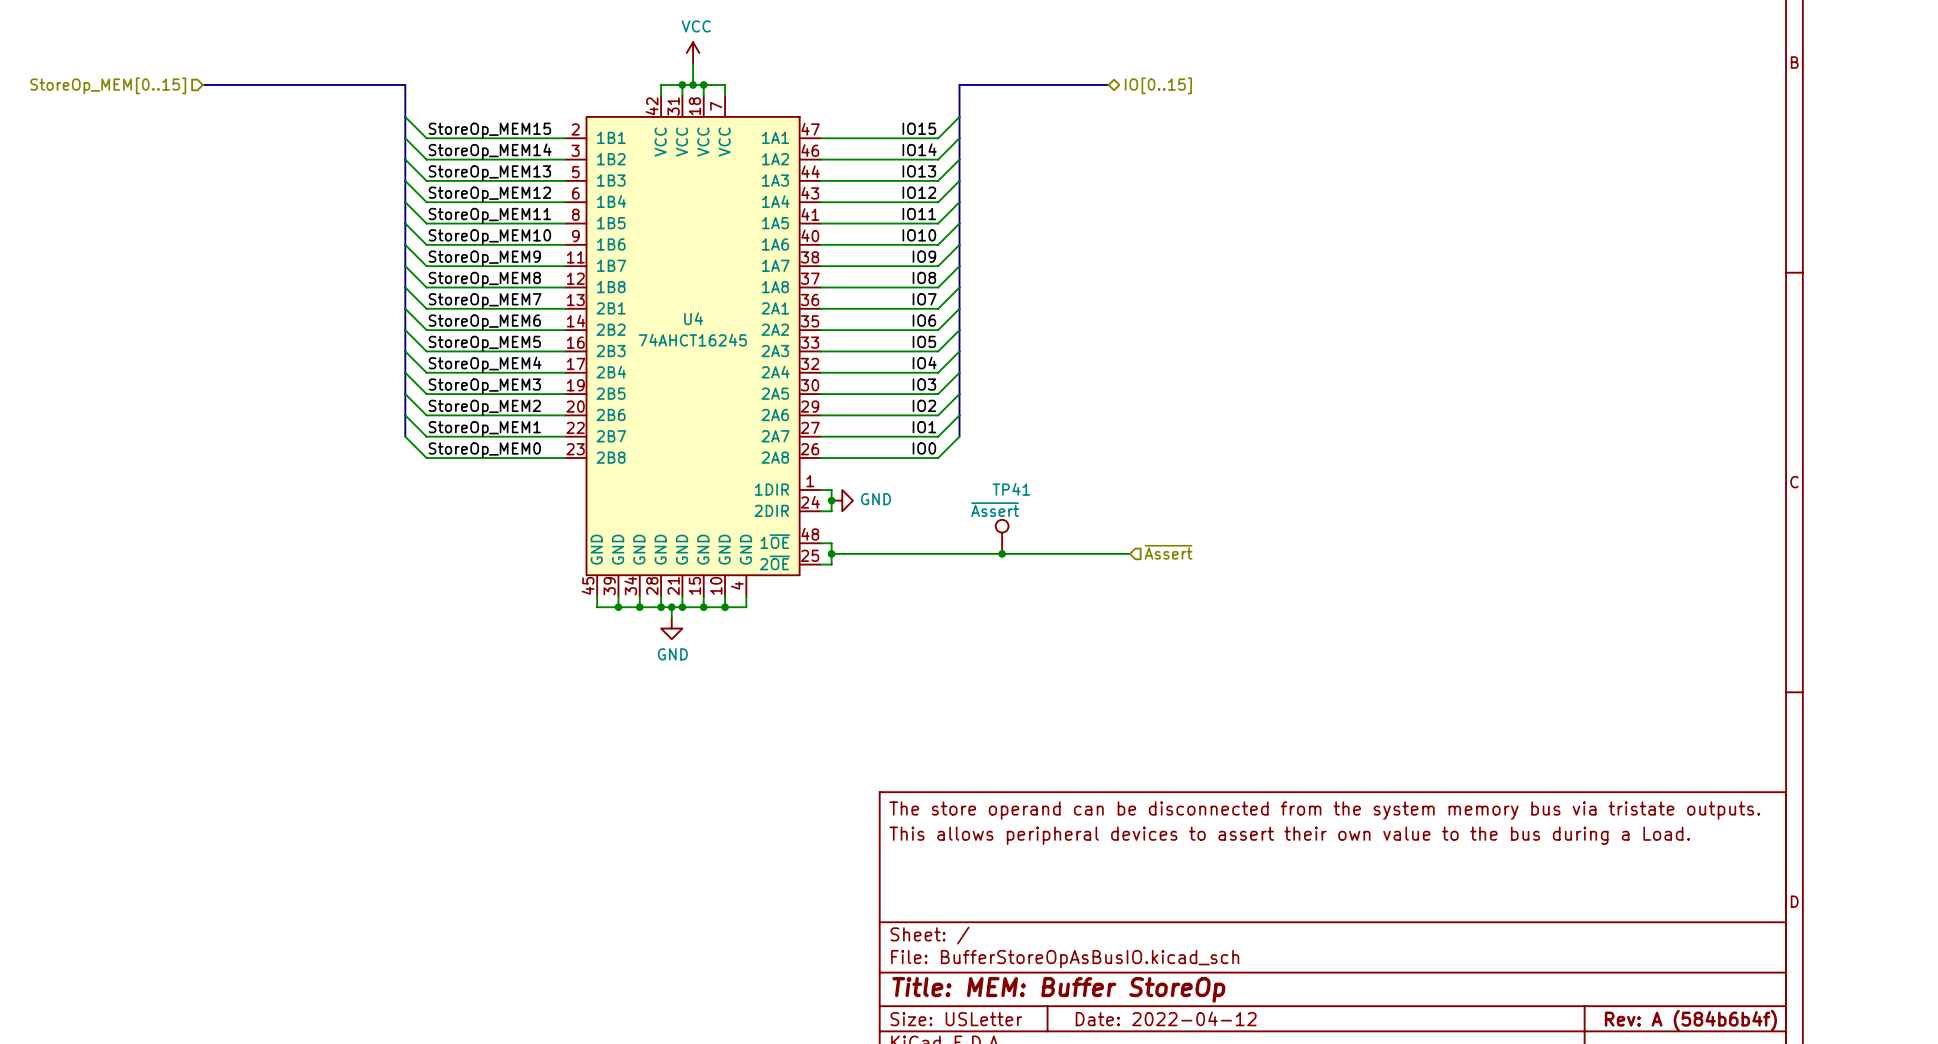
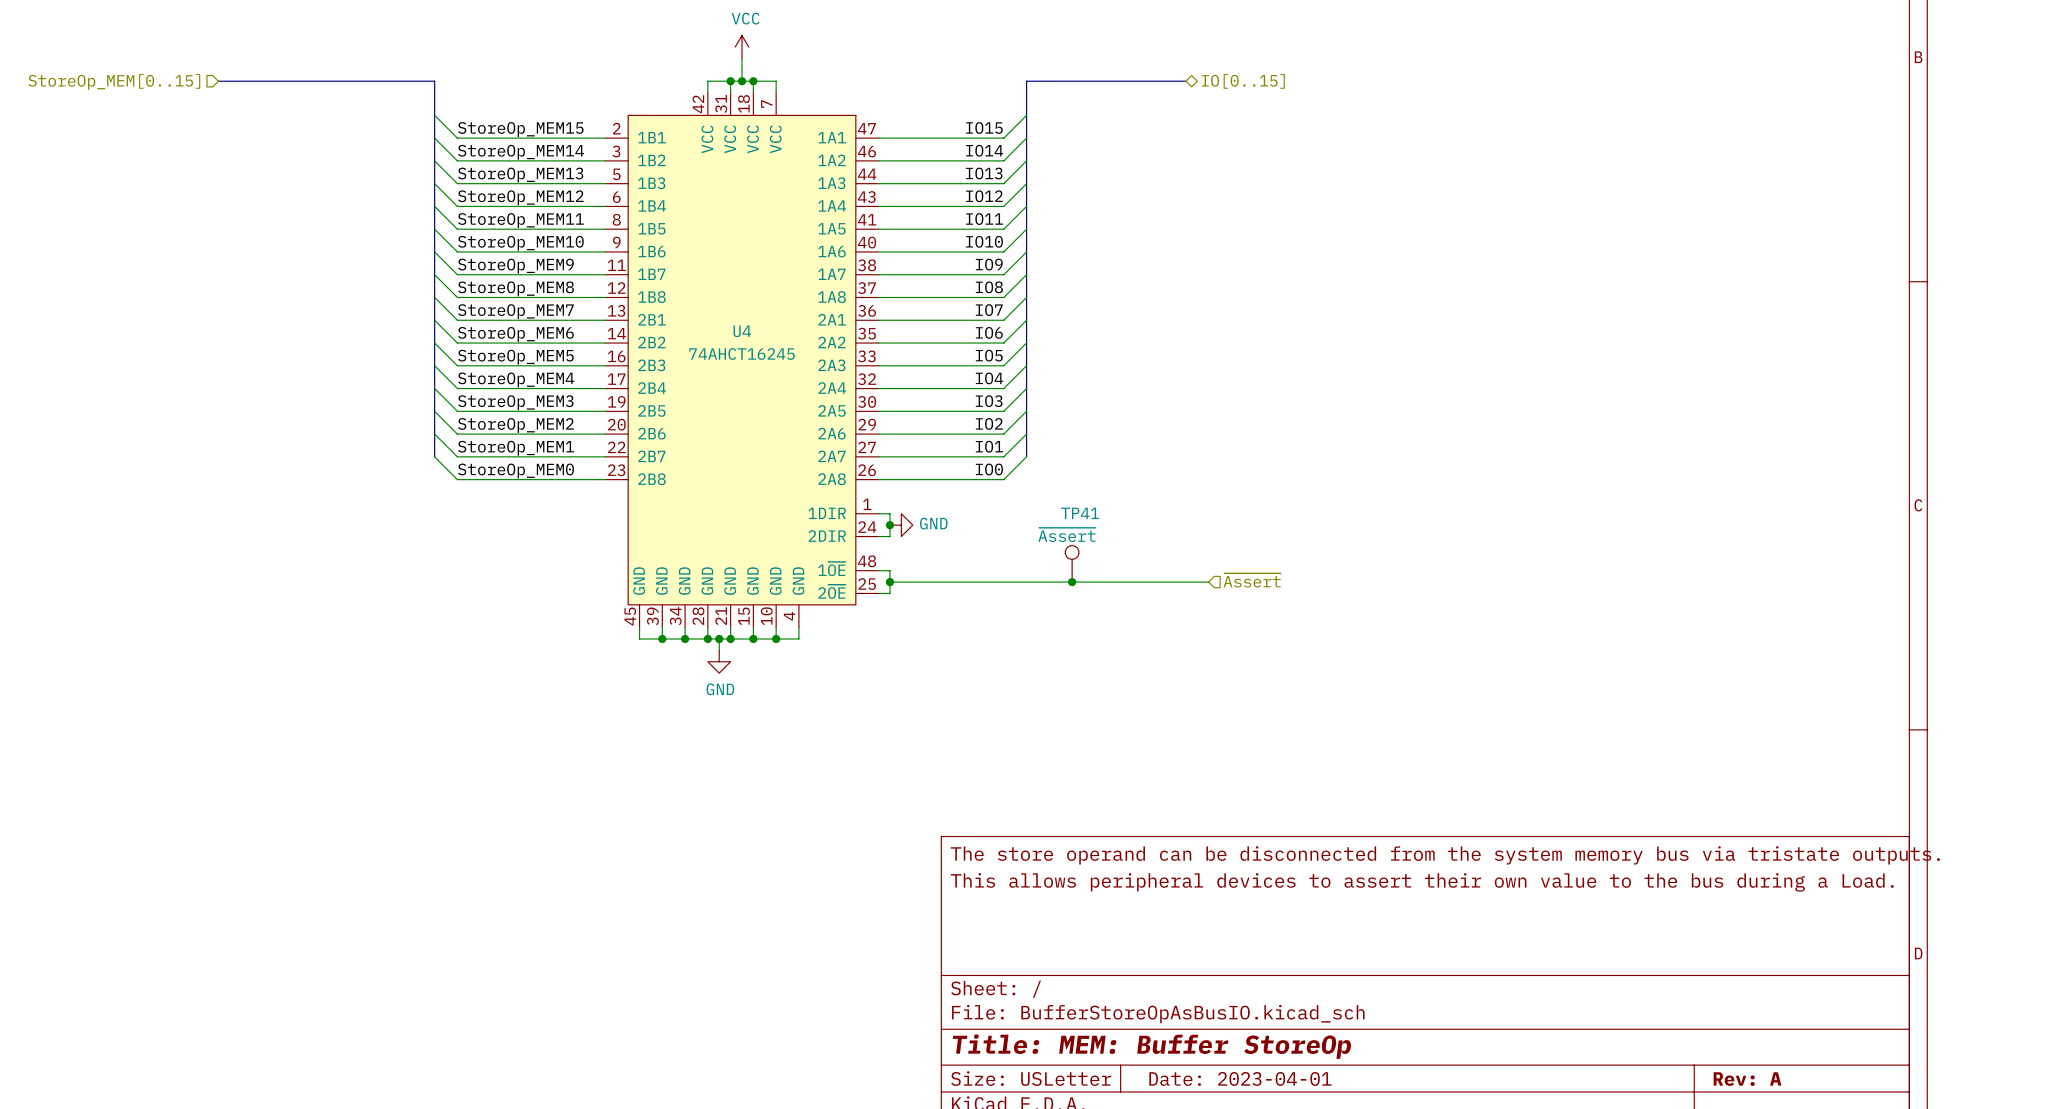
title block: Date: 2022-04-12 (1166, 1018) -> Date: 2023-04-01 (1240, 1078)
title block: Rev: A (584b6b4f) (1690, 1020) -> Rev: A (1747, 1079)

